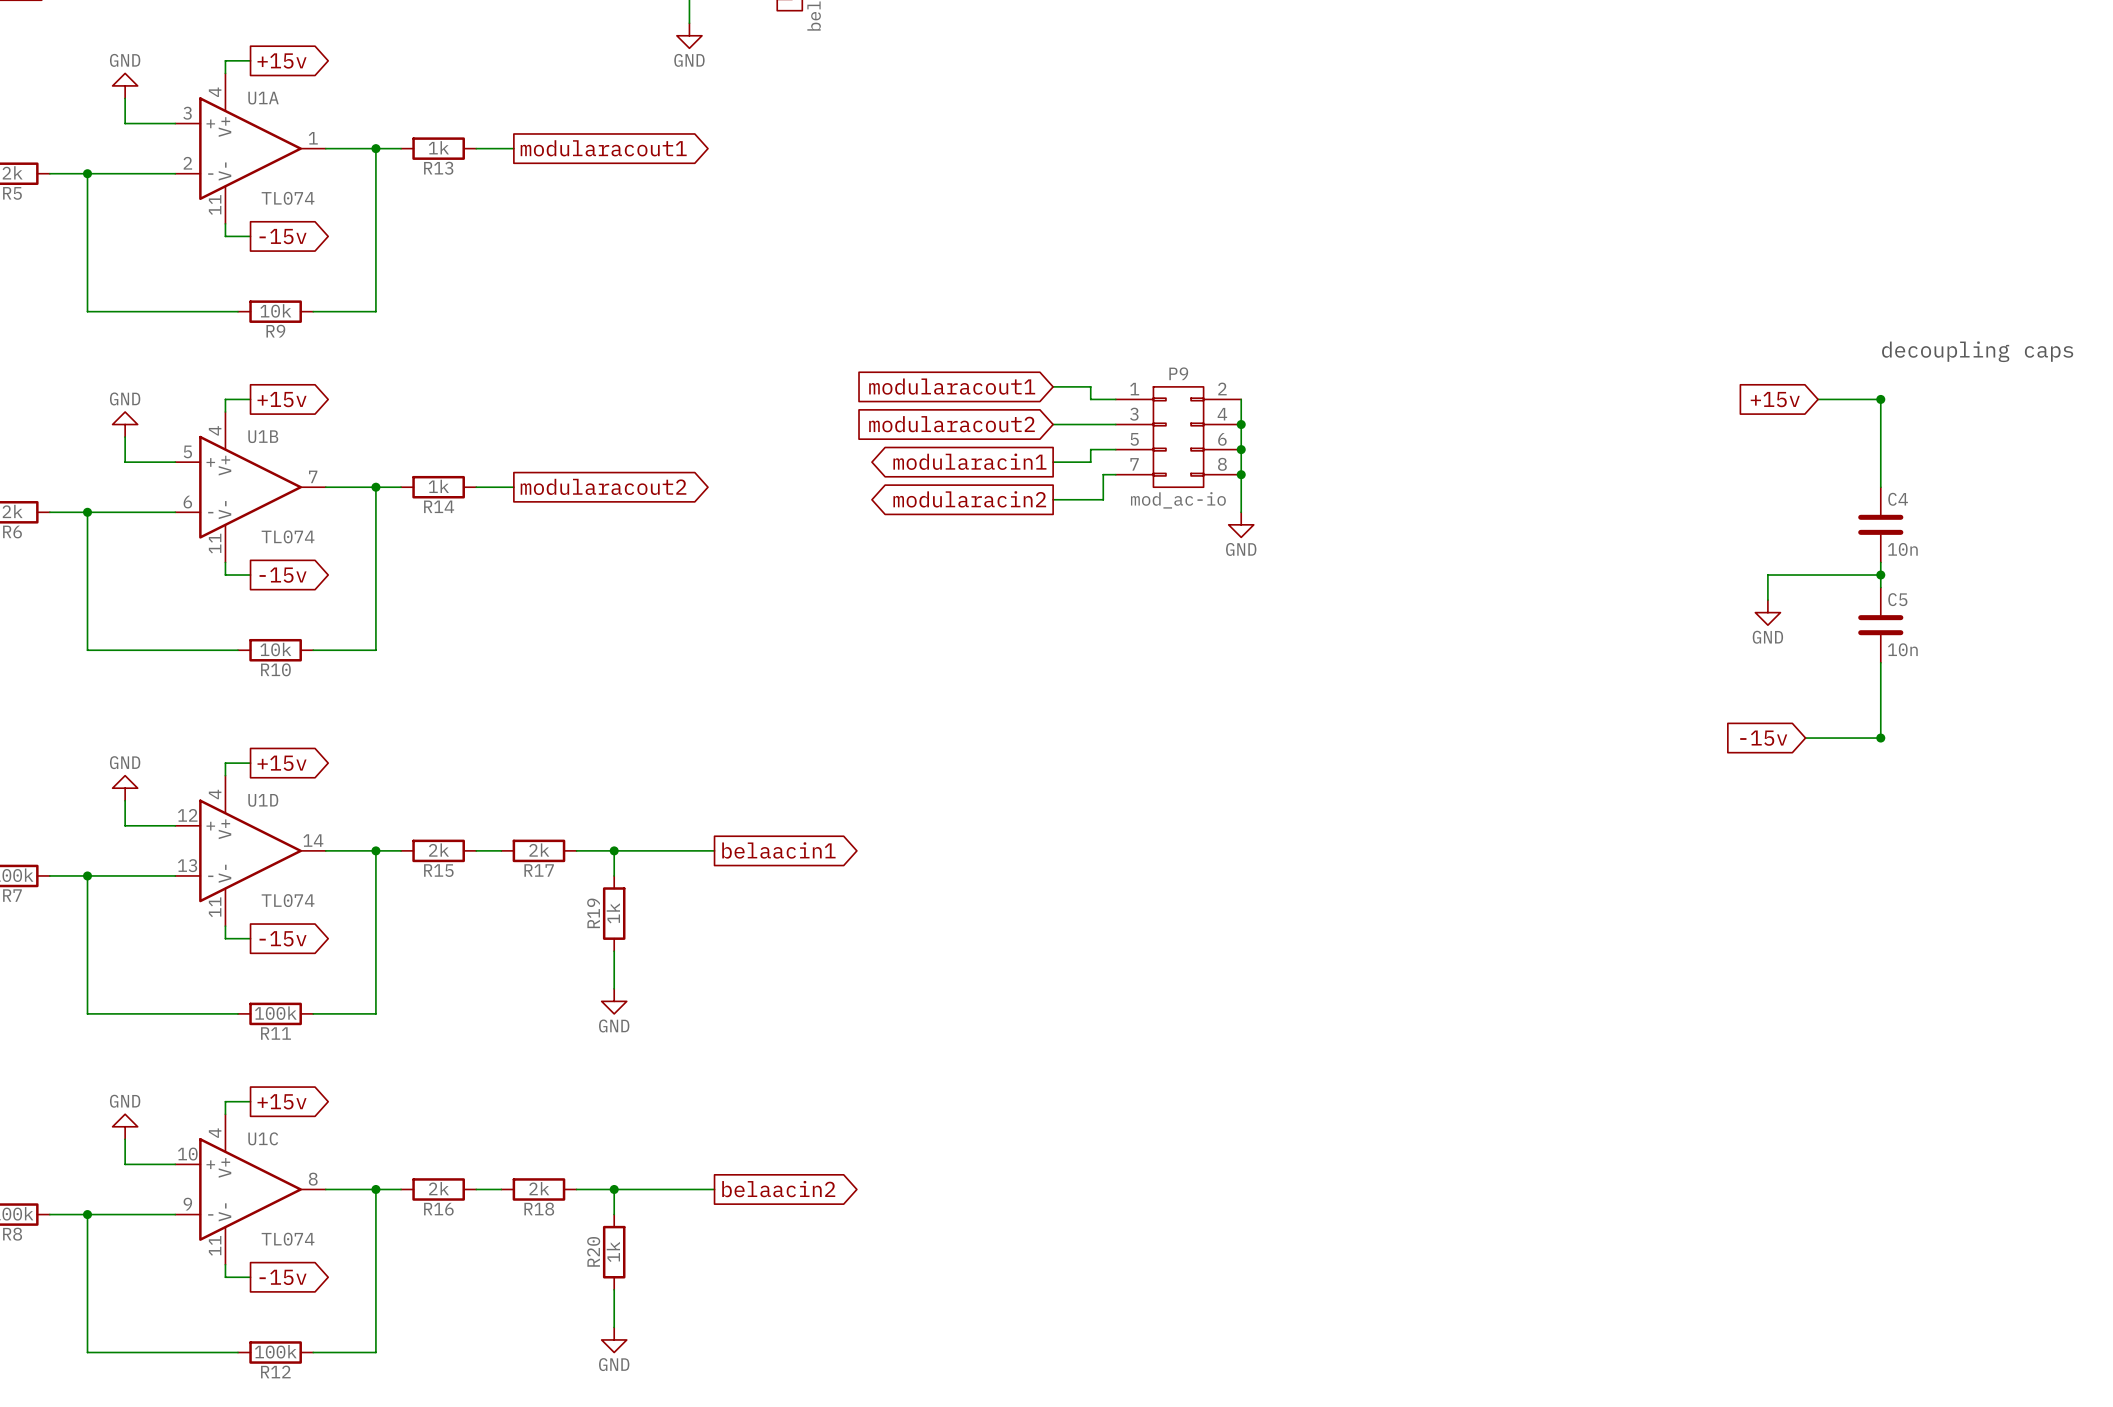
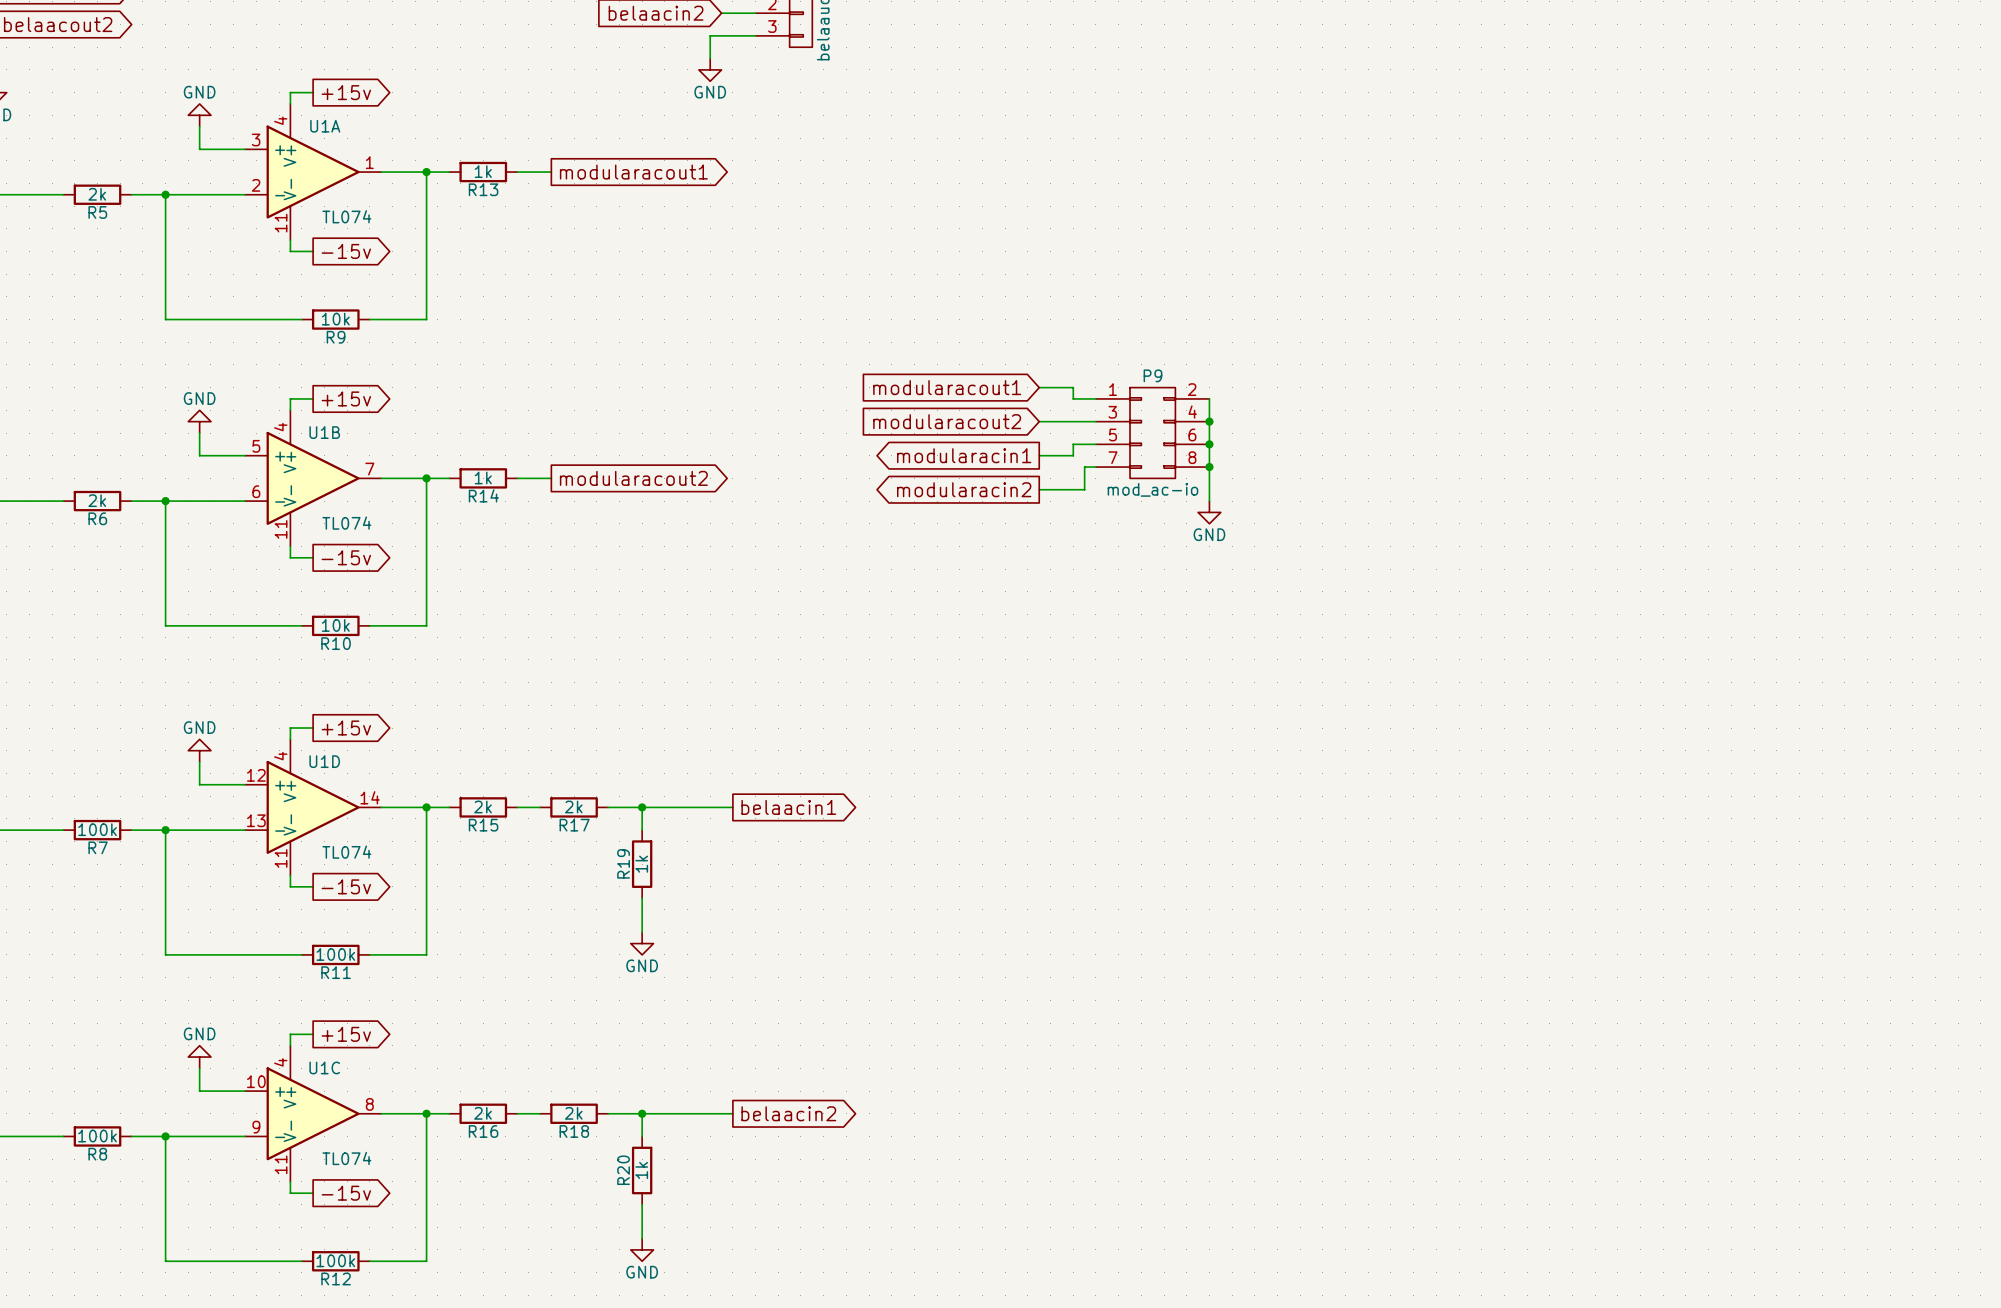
text: decoupling caps (1977, 351) -> none
global label: +15v (1775, 399) -> none
wire: (1818, 399) (1880, 399) (1880, 487) -> none
junction: (1880, 399) -> none
C4: 10n (1880, 524) -> none
wire: (1880, 562) (1880, 587) -> none
wire: (1880, 575) (1767, 575) (1767, 600) -> none
junction: (1880, 575) -> none
power symbol: GND (1767, 612) -> none
C5: 10n (1880, 625) -> none
wire: (1880, 662) (1880, 738) (1805, 738) -> none
global label: -15v (1763, 738) -> none
junction: (1880, 738) -> none

